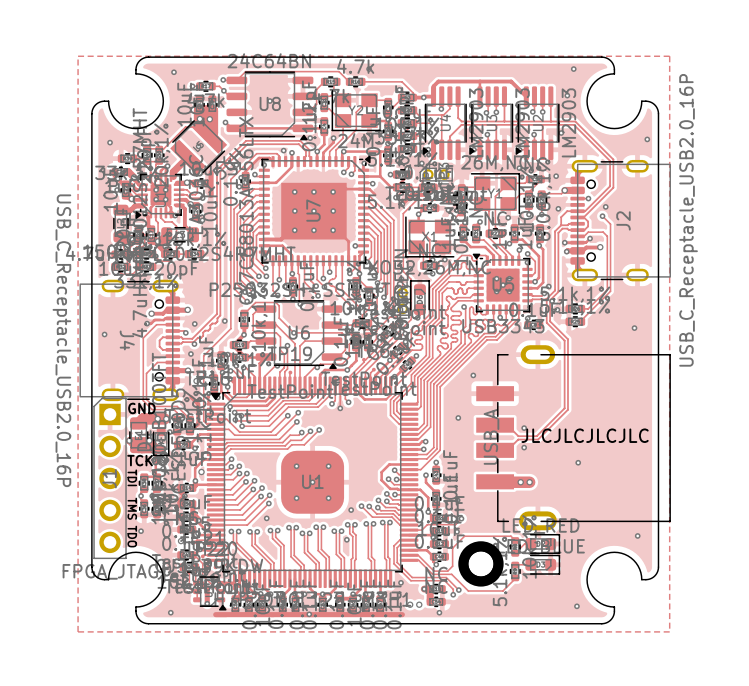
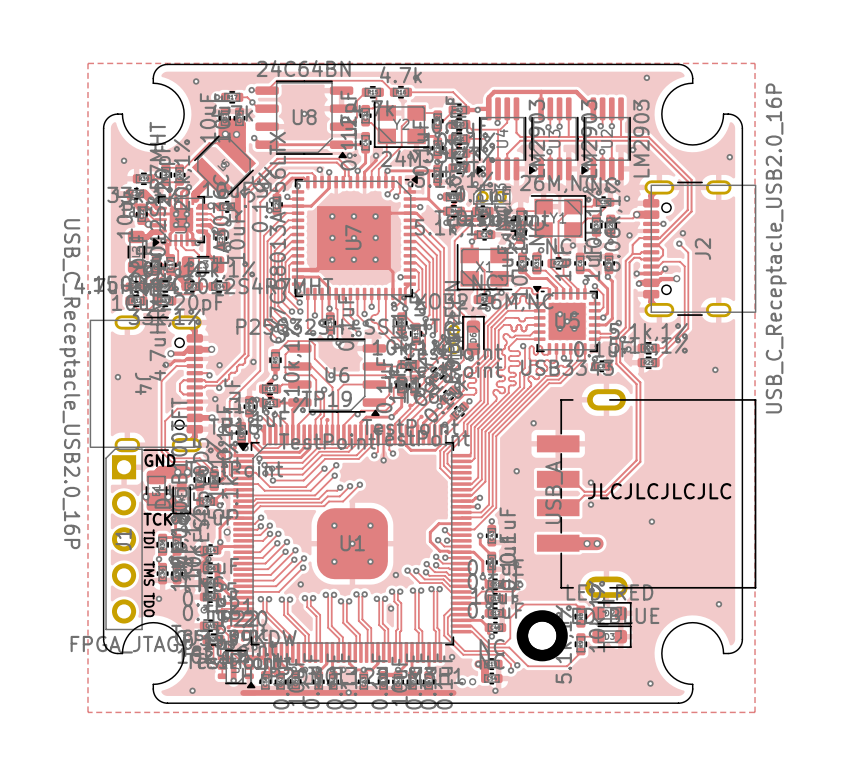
via: (509, 243) -> none

